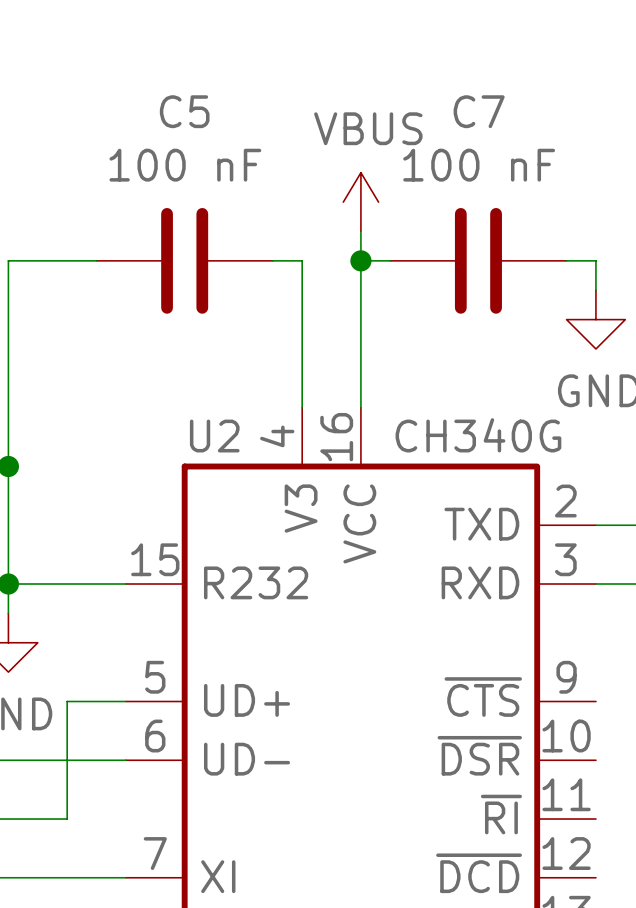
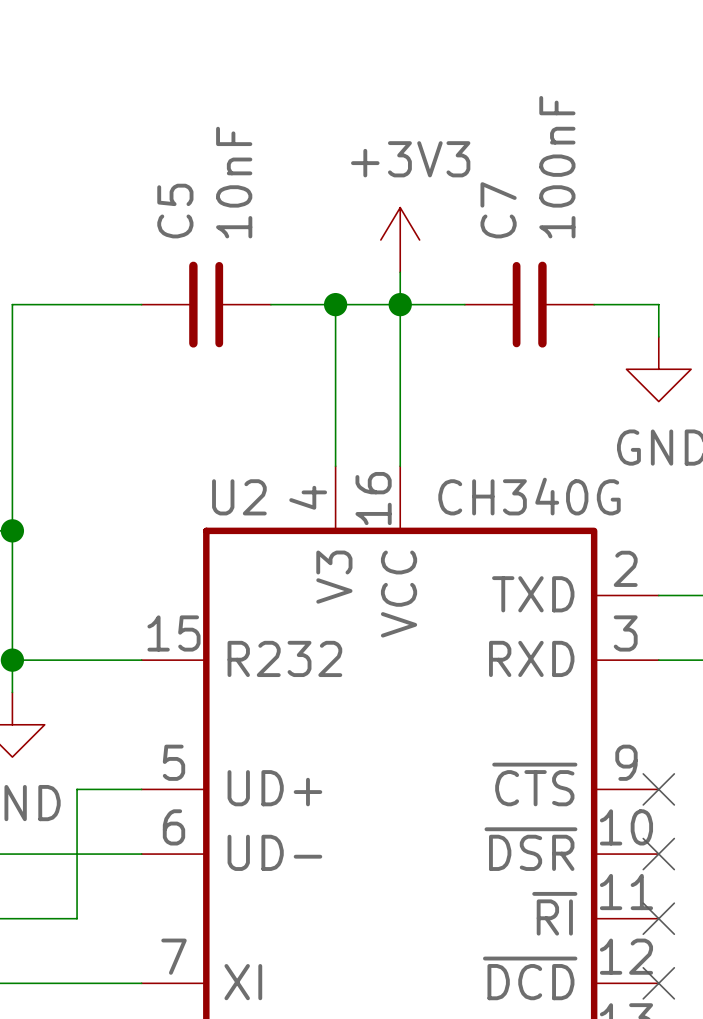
C5 name position: C5 (184, 111) -> C5 (175, 211)
C7 name position: C7 (479, 111) -> C7 (498, 210)
C5 value: 100 nF (185, 165) -> 10nF (234, 182)
C7 value: 100 nF (479, 165) -> 100nF (557, 167)
power symbol: VBUS (360, 202) -> +3V3 (400, 239)
C5 symbol: [96, 207, 273, 314] -> [141, 261, 271, 348]
C7 symbol: [390, 207, 567, 314] -> [464, 261, 595, 348]
wire: none -> (335, 304) (400, 304)
junction: none -> (335, 304)
no-connect mark: none -> (658, 789)
no-connect mark: none -> (658, 854)
no-connect mark: none -> (658, 918)
no-connect mark: none -> (658, 983)

